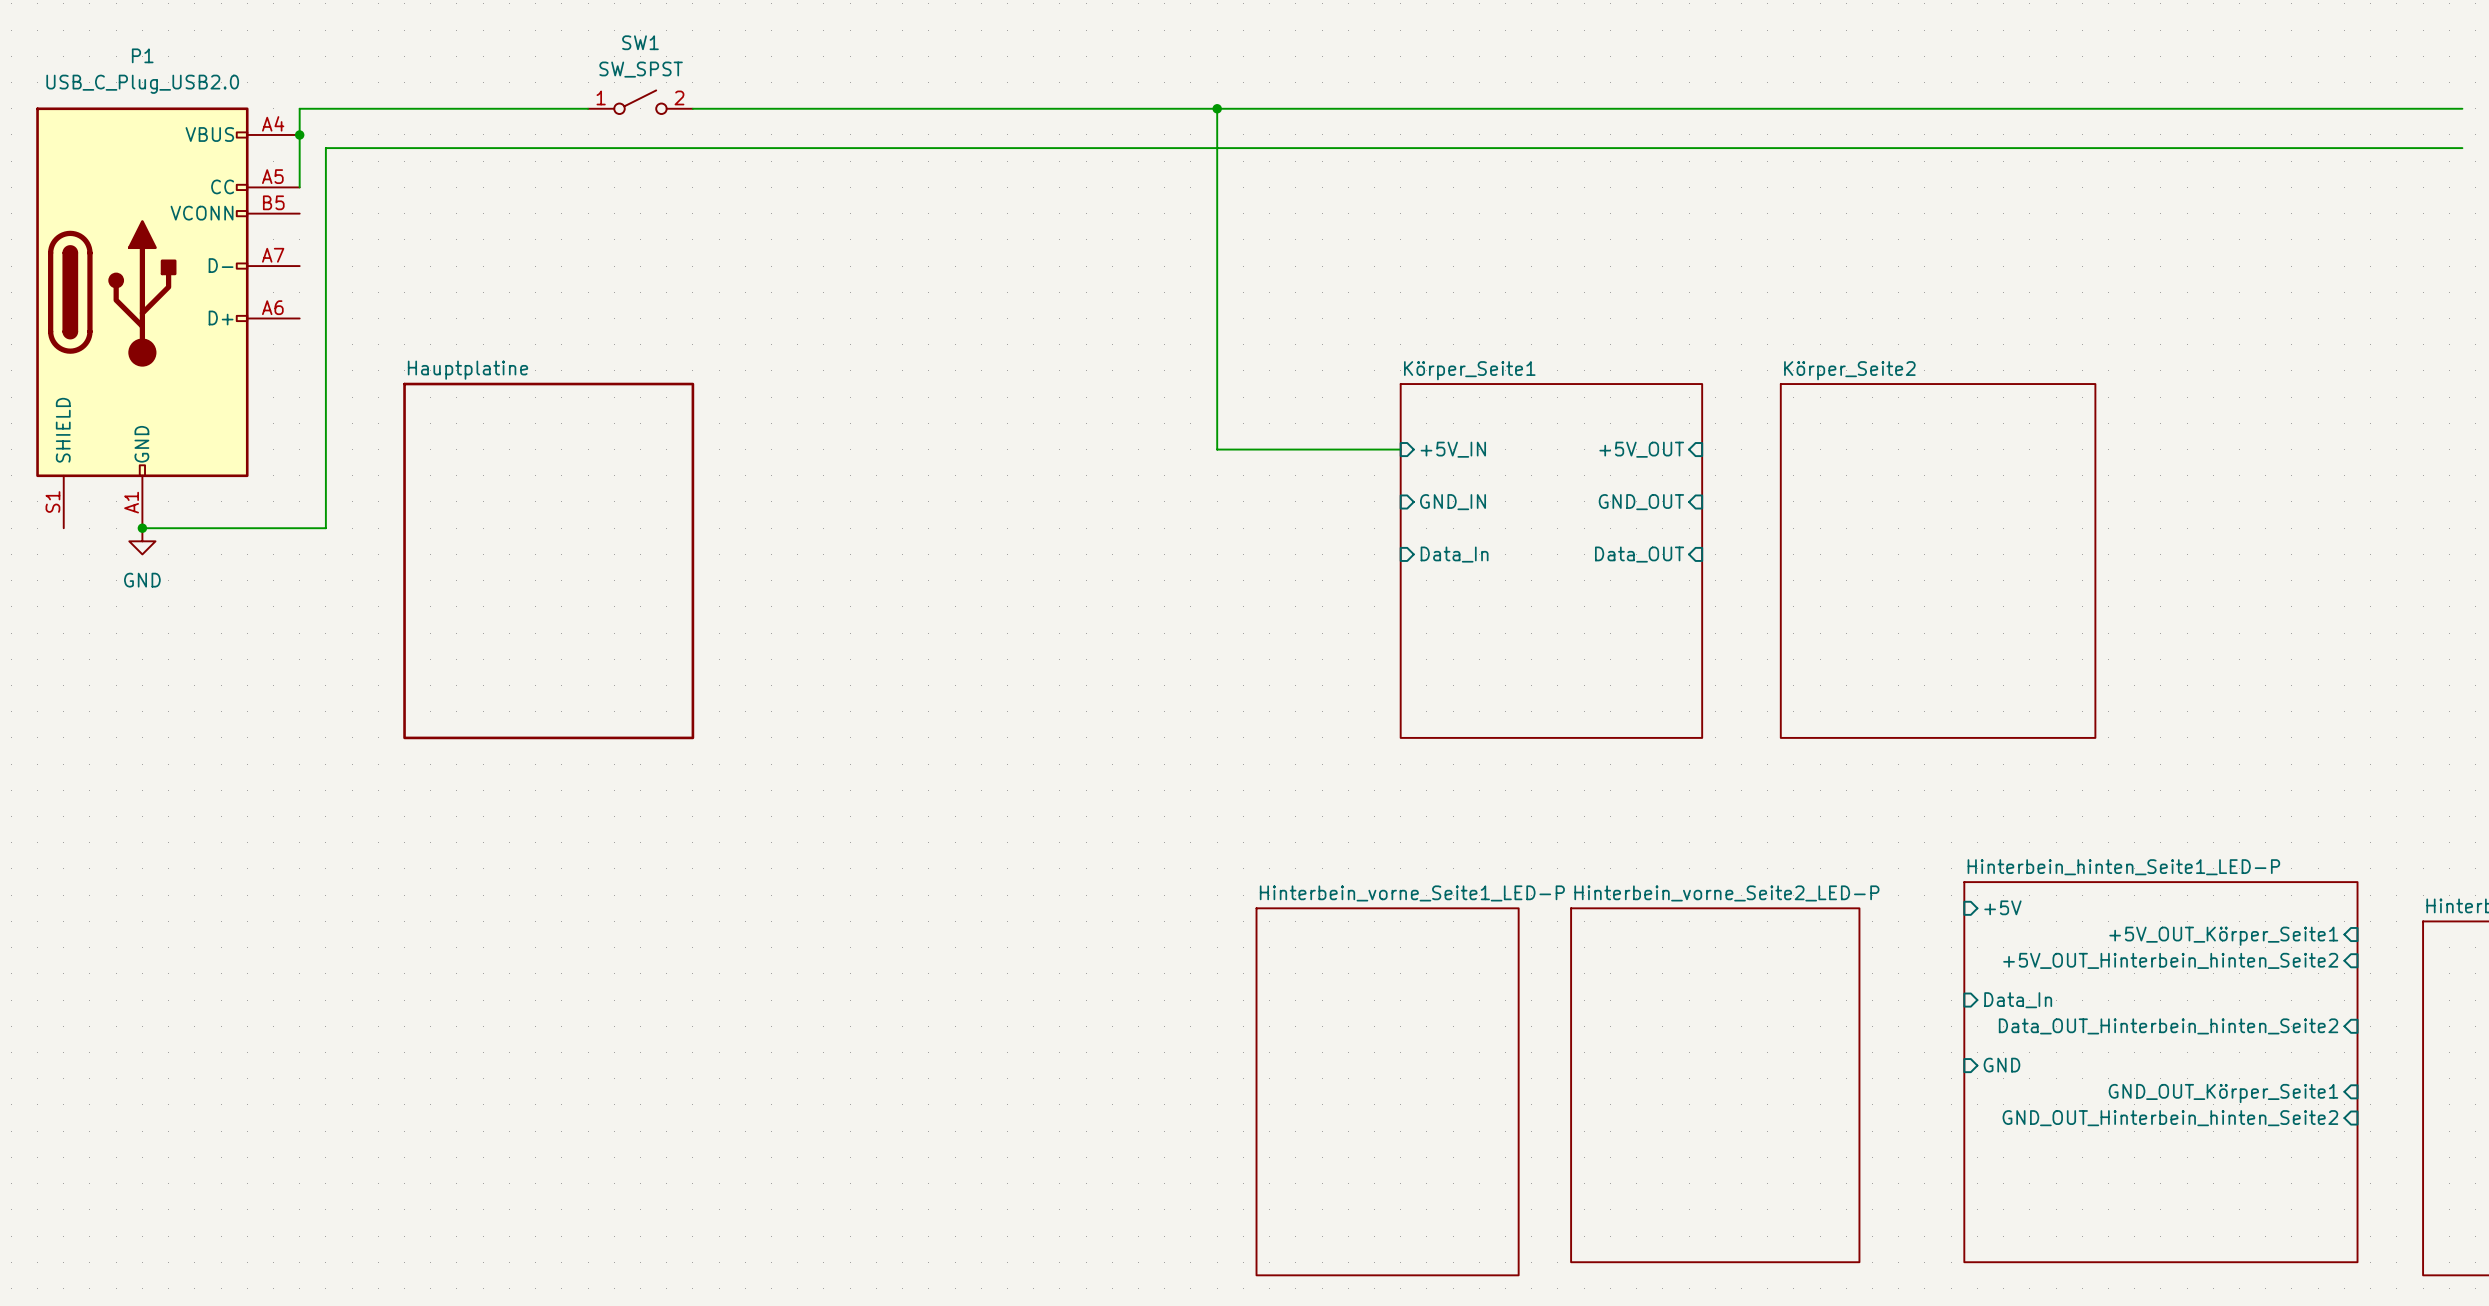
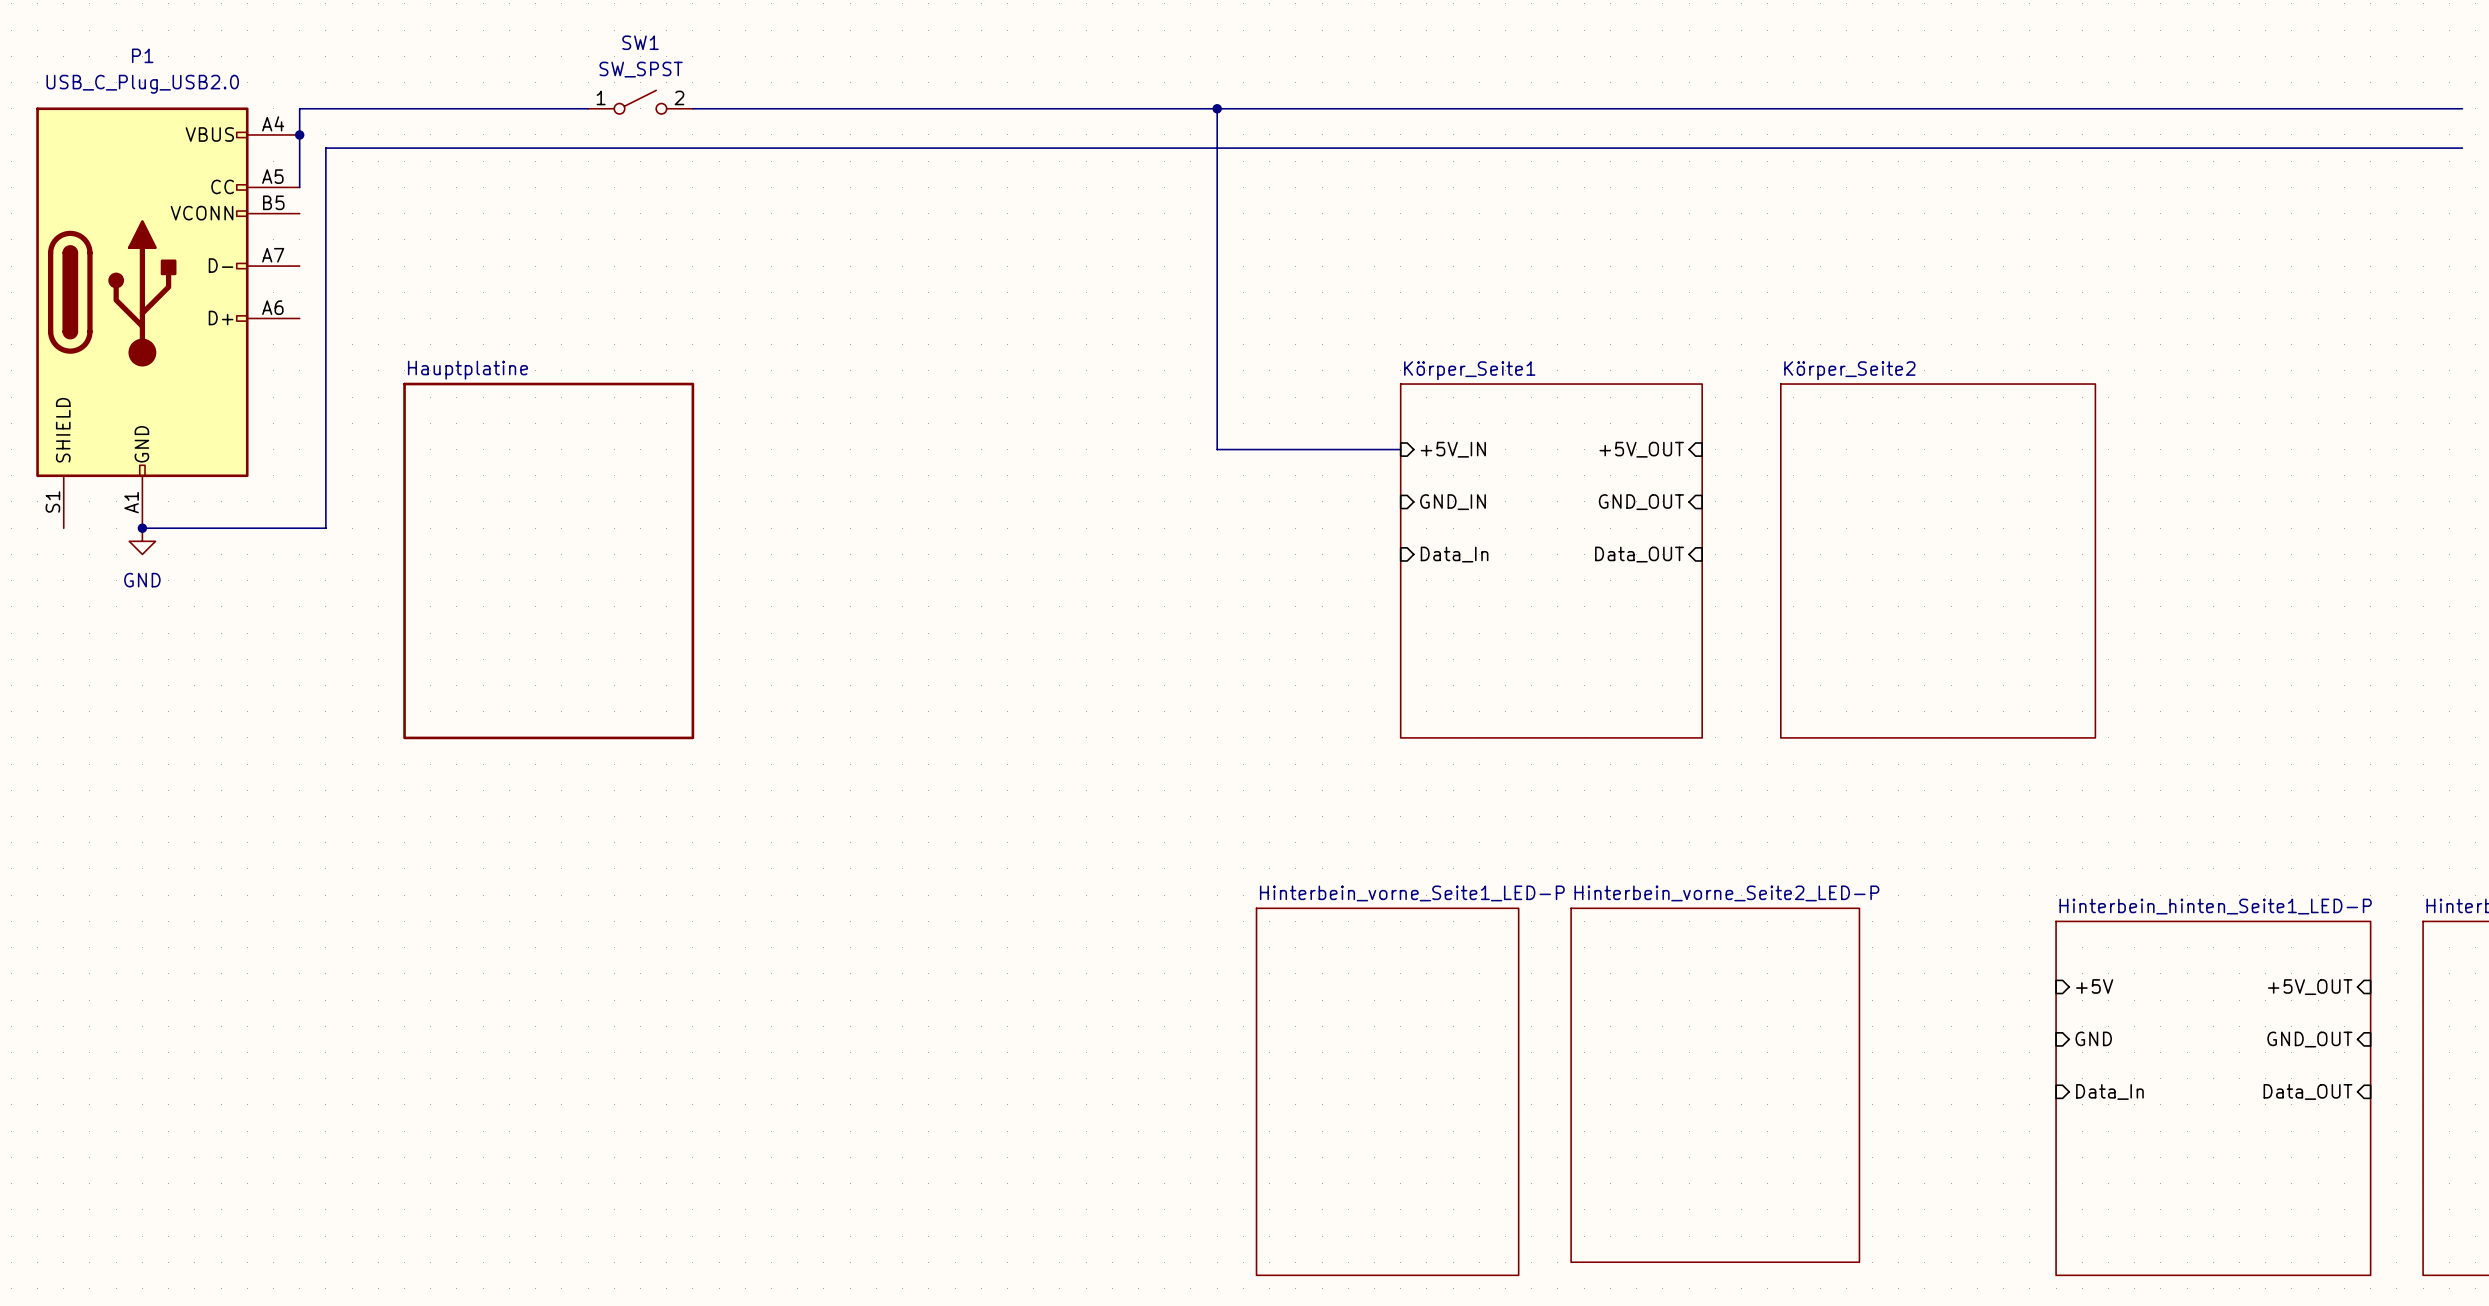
sheet Hinterbein_hinten_Seite1_LED-P name position: Hinterbein_hinten_Seite1_LED-P (2123, 867) -> Hinterbein_hinten_Seite1_LED-P (2215, 906)
sheet Hinterbein_hinten_Seite1_LED-P shape: [1963, 881, 2359, 1264] -> [2055, 920, 2372, 1277]
sheet pin position: +5V (2002, 907) -> +5V (2094, 986)
sheet pin: +5V_OUT_Körper_Seite1 (2223, 936) -> none
sheet pin: +5V_OUT_Hinterbein_hinten_Seite2 (2170, 960) -> none
sheet pin: none -> +5V_OUT (2310, 987)
sheet pin position: Data_In (2018, 1000) -> Data_In (2109, 1091)
sheet pin: Data_OUT_Hinterbein_hinten_Seite2 (2168, 1026) -> none
sheet pin: none -> GND_OUT (2309, 1039)
sheet pin position: GND (2001, 1065) -> GND (2093, 1038)
sheet pin: none -> Data_OUT (2308, 1091)
sheet pin: GND_OUT_Körper_Seite1 (2223, 1093) -> none
sheet pin: GND_OUT_Hinterbein_hinten_Seite2 (2170, 1118) -> none

